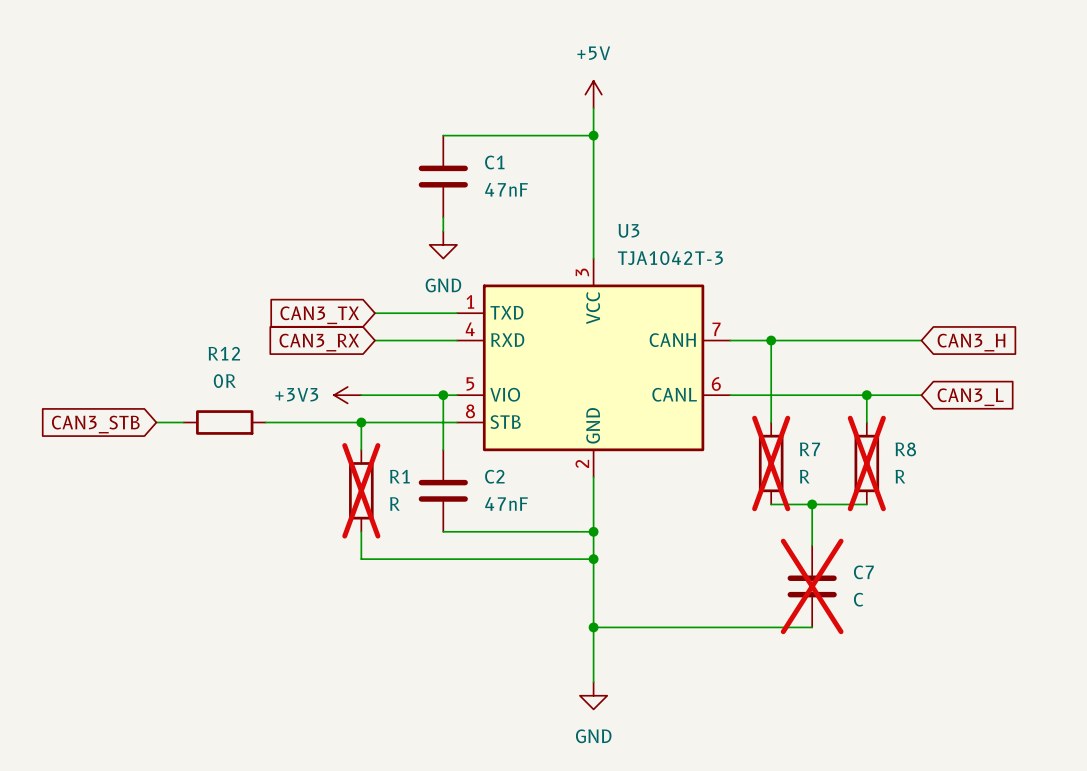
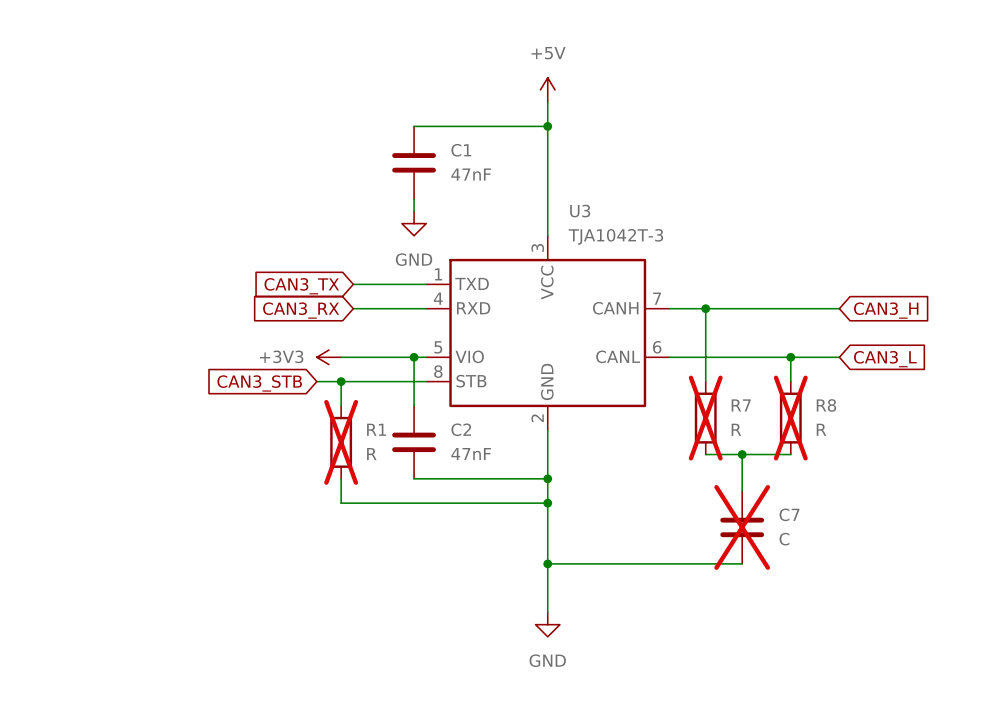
wire: (156, 422) (183, 422) -> none
R12: 0R (224, 422) -> none
wire: (265, 422) (334, 422) -> none
global label position: CAN3_STB (95, 424) -> CAN3_STB (259, 383)

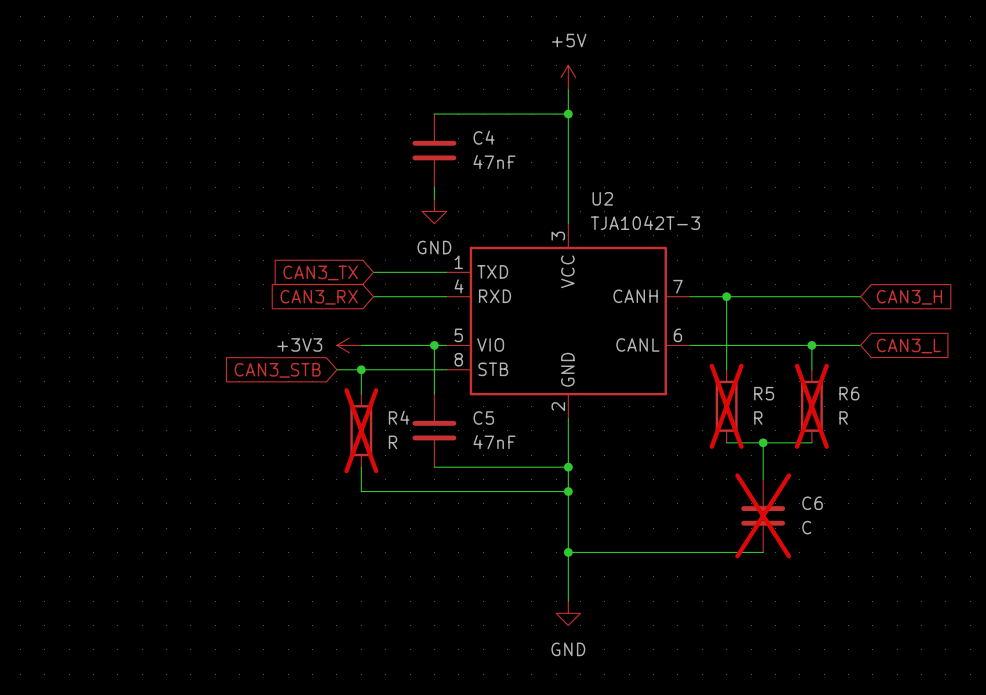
C1 name: C1 (461, 150) -> C4 (484, 137)
U3 name: U3 (580, 211) -> U2 (602, 198)
R7 name: R7 (741, 405) -> R5 (764, 393)
R8 name: R8 (826, 405) -> R6 (849, 393)
R1 name: R1 (376, 429) -> R4 (399, 417)
C2 name: C2 (461, 429) -> C5 (483, 418)
C7 name: C7 (789, 514) -> C6 (812, 503)

